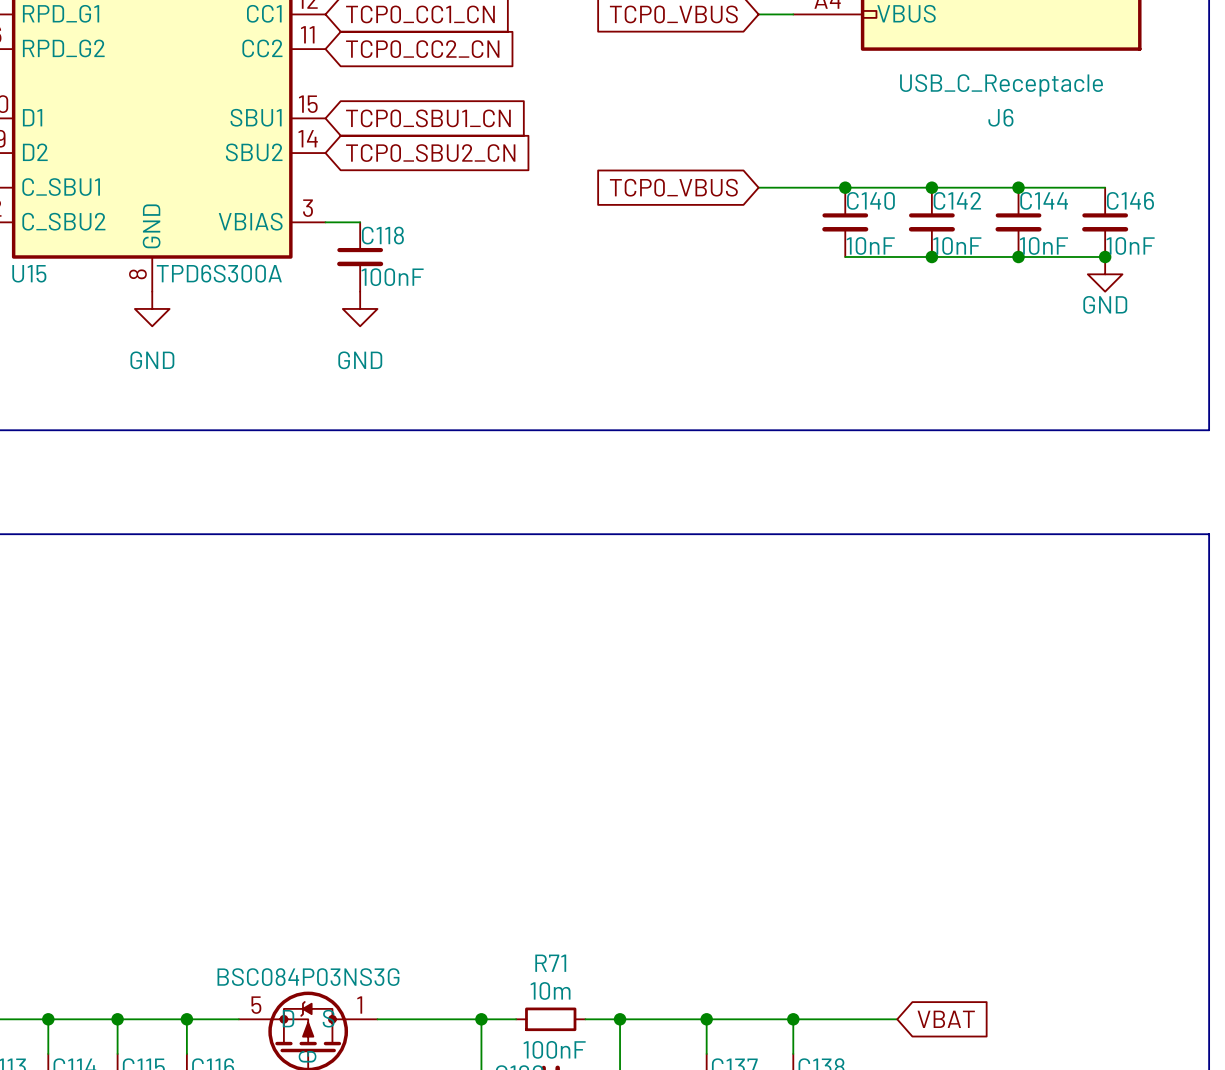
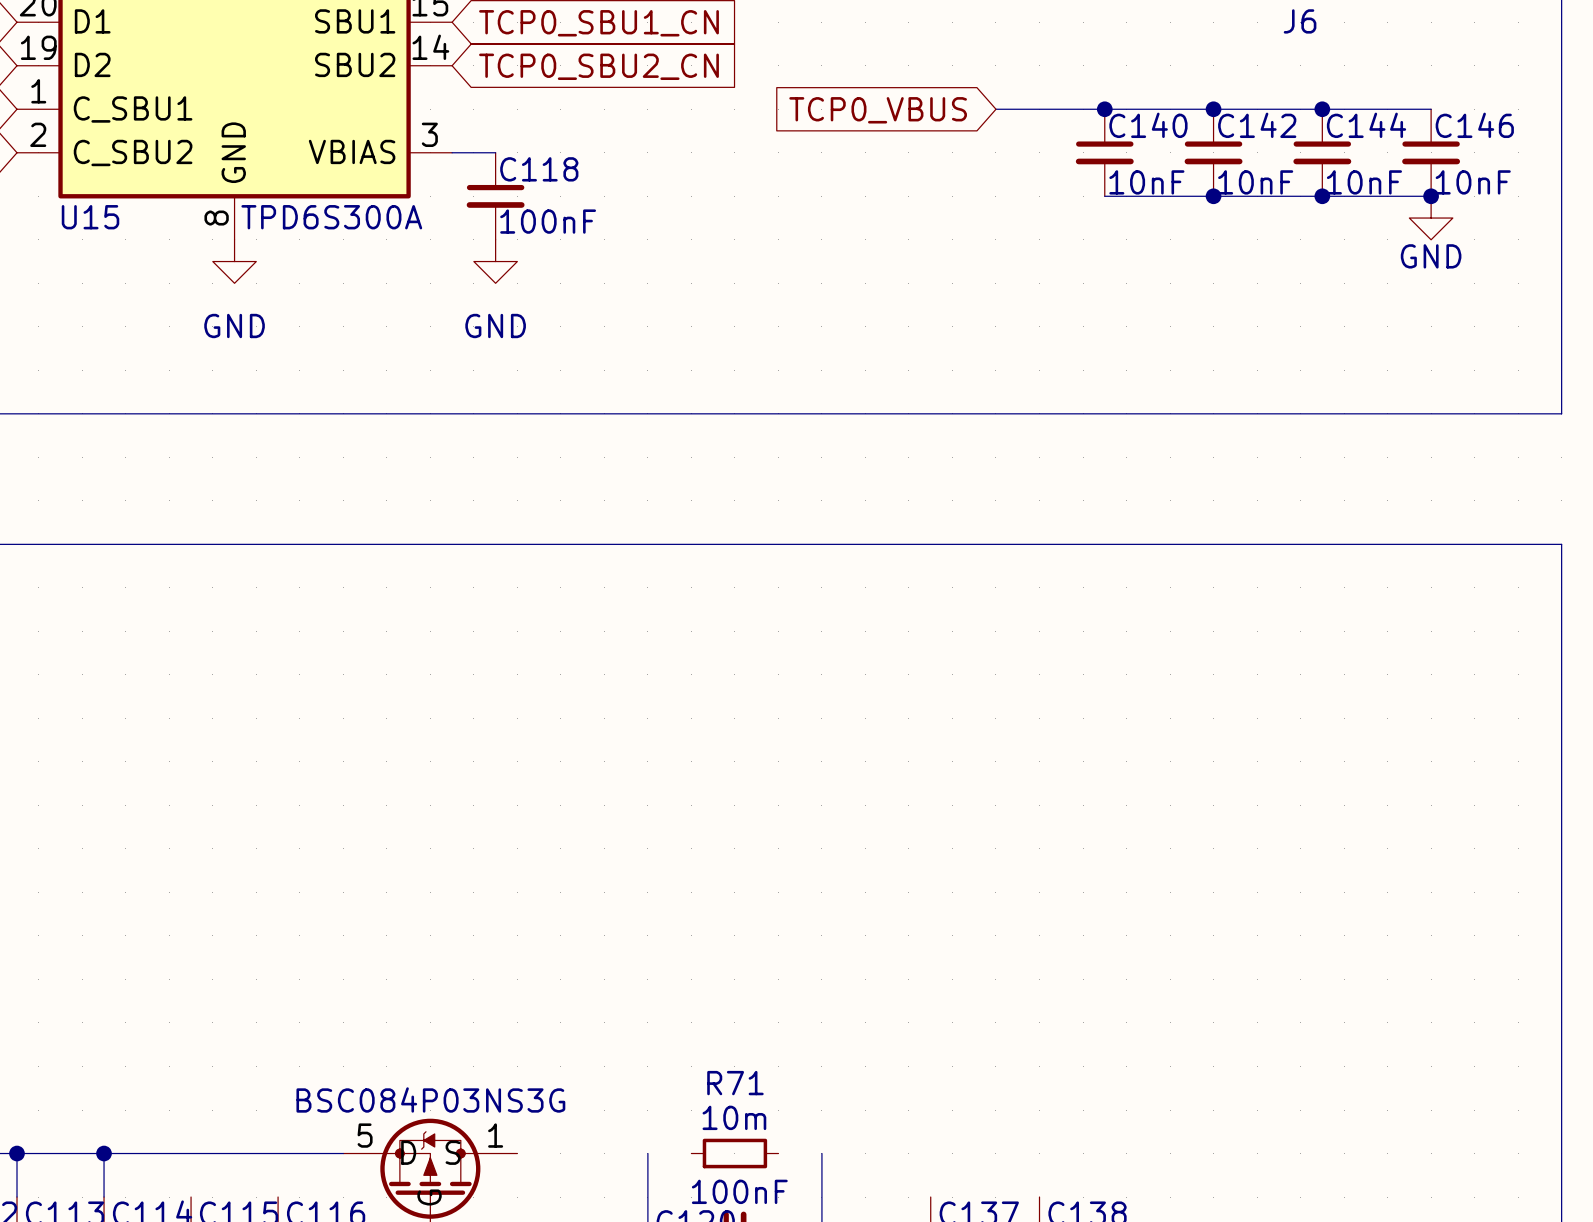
wire: (117, 1019) (117, 1053) -> none
junction: (117, 1019) -> none
wire: (186, 1019) (186, 1053) -> none
junction: (186, 1019) -> none
wire: (377, 1019) (516, 1019) -> none
junction: (481, 1019) -> none
wire: (585, 1019) (897, 1019) -> none
junction: (620, 1019) -> none
wire: (706, 1019) (706, 1053) -> none
junction: (706, 1019) -> none
wire: (793, 1019) (793, 1053) -> none
junction: (793, 1019) -> none
global label: VBAT (946, 1019) -> none

